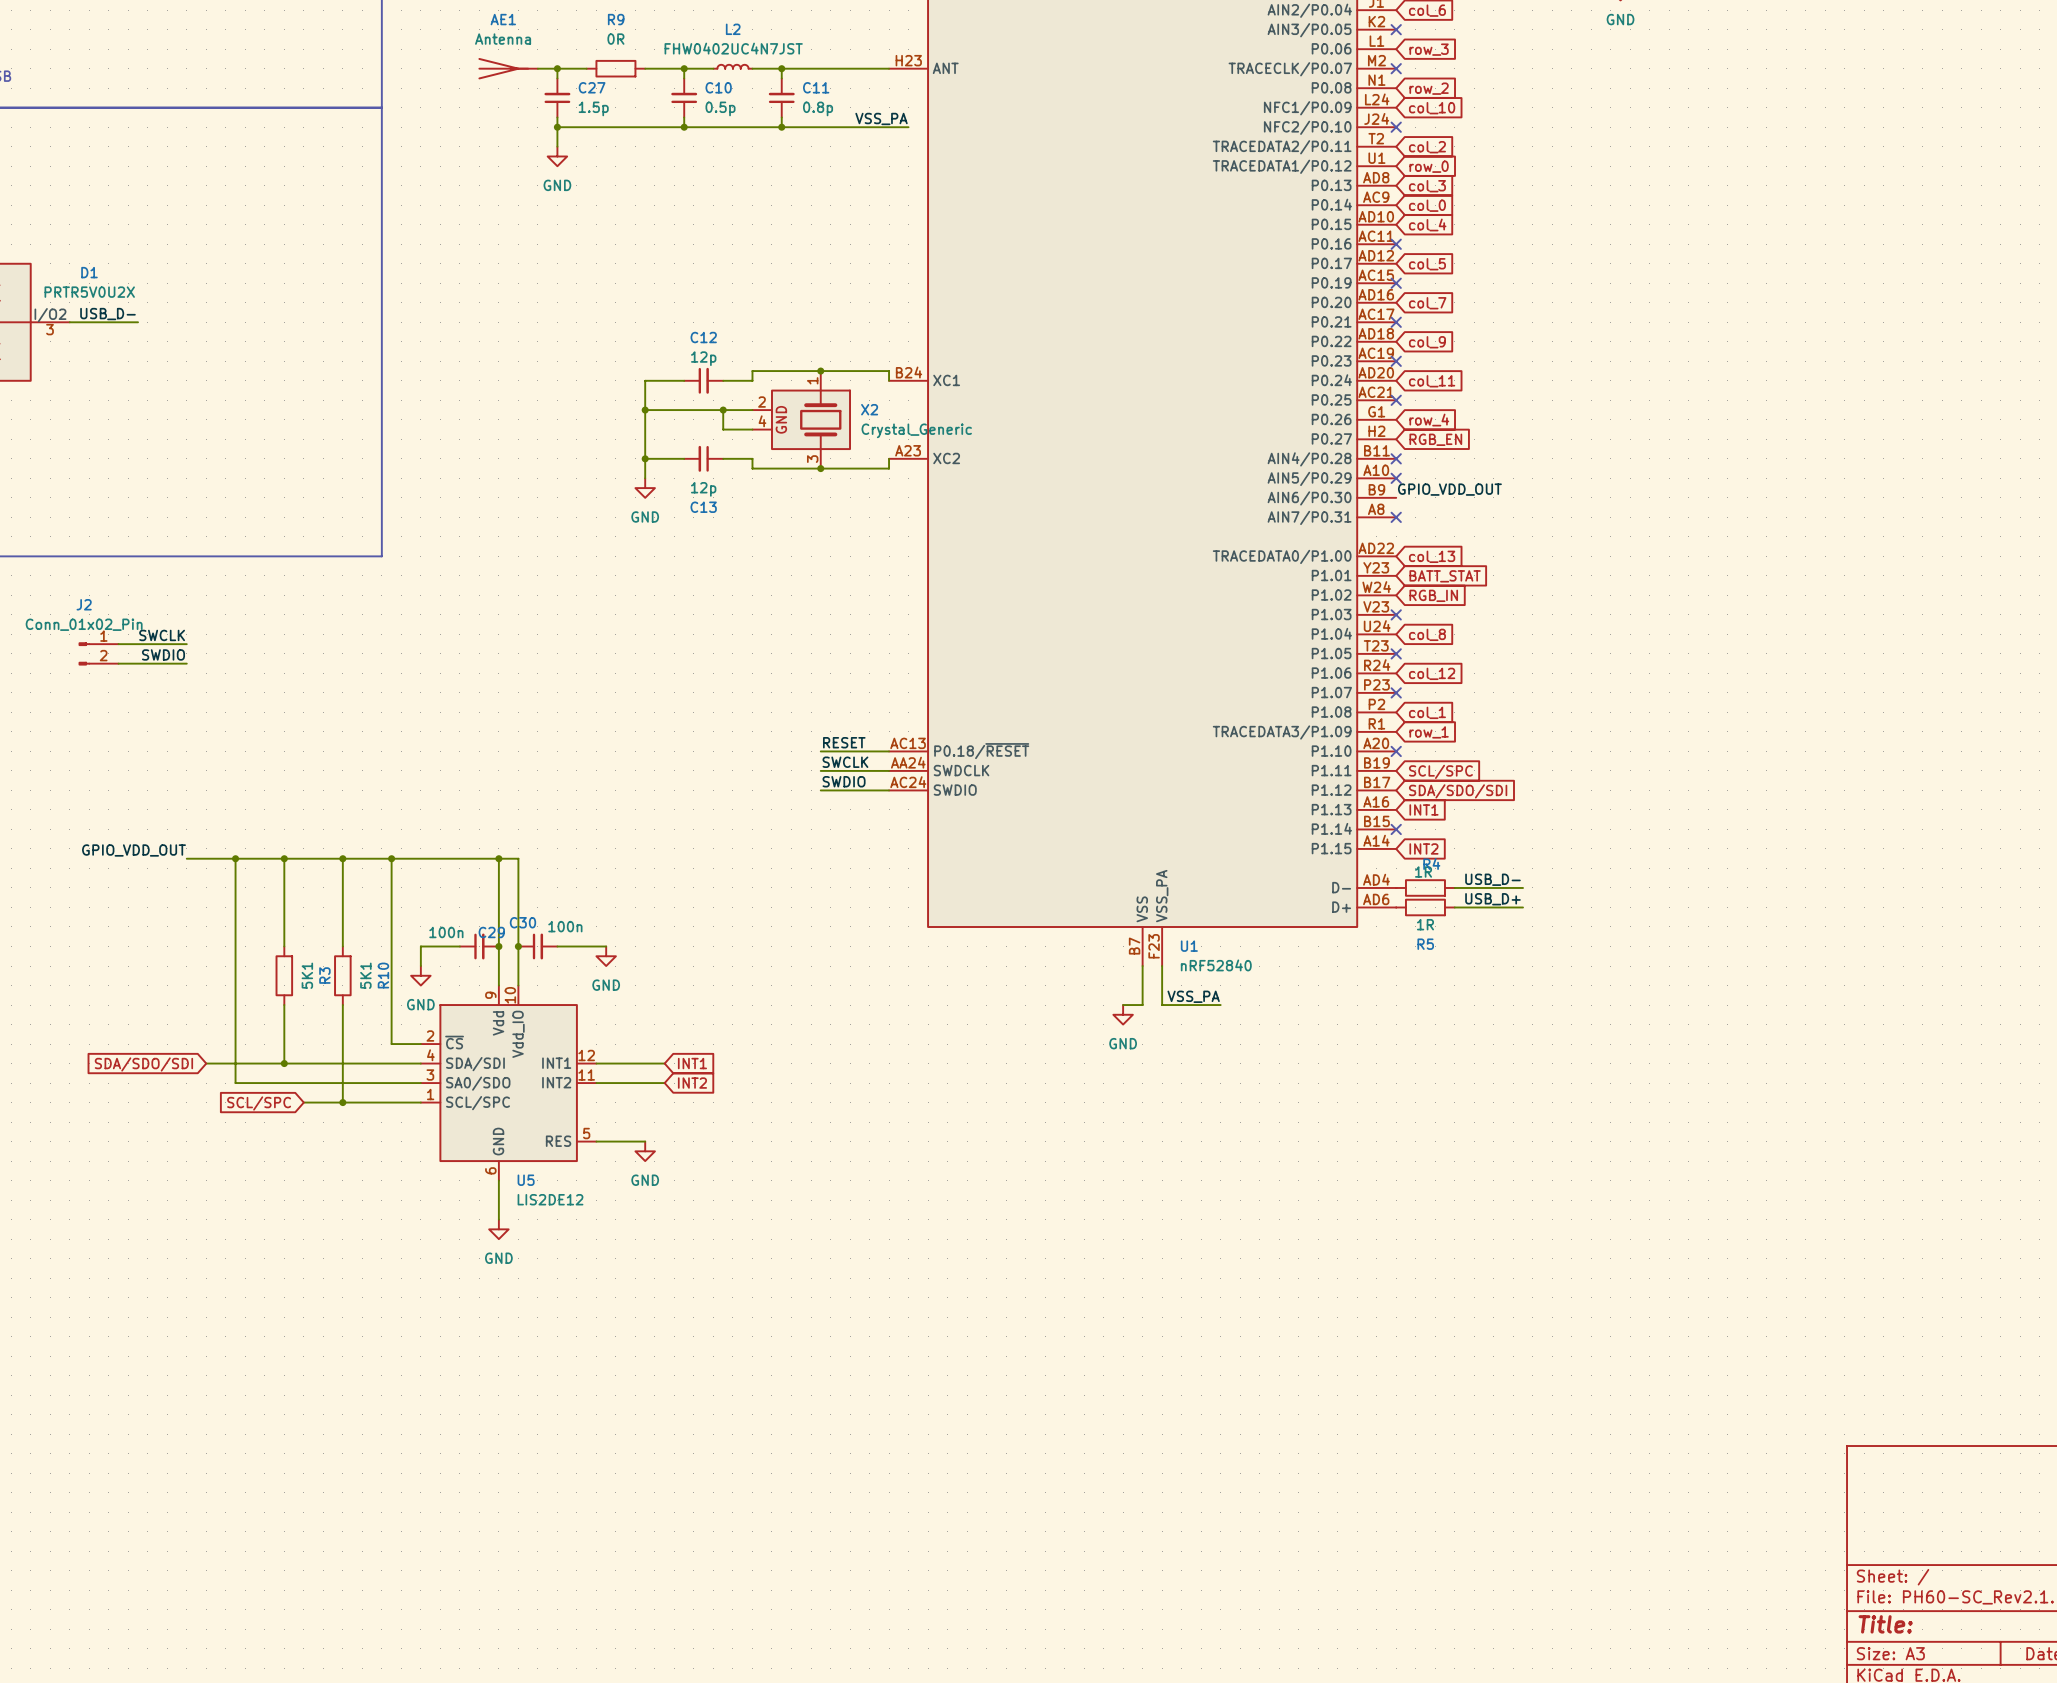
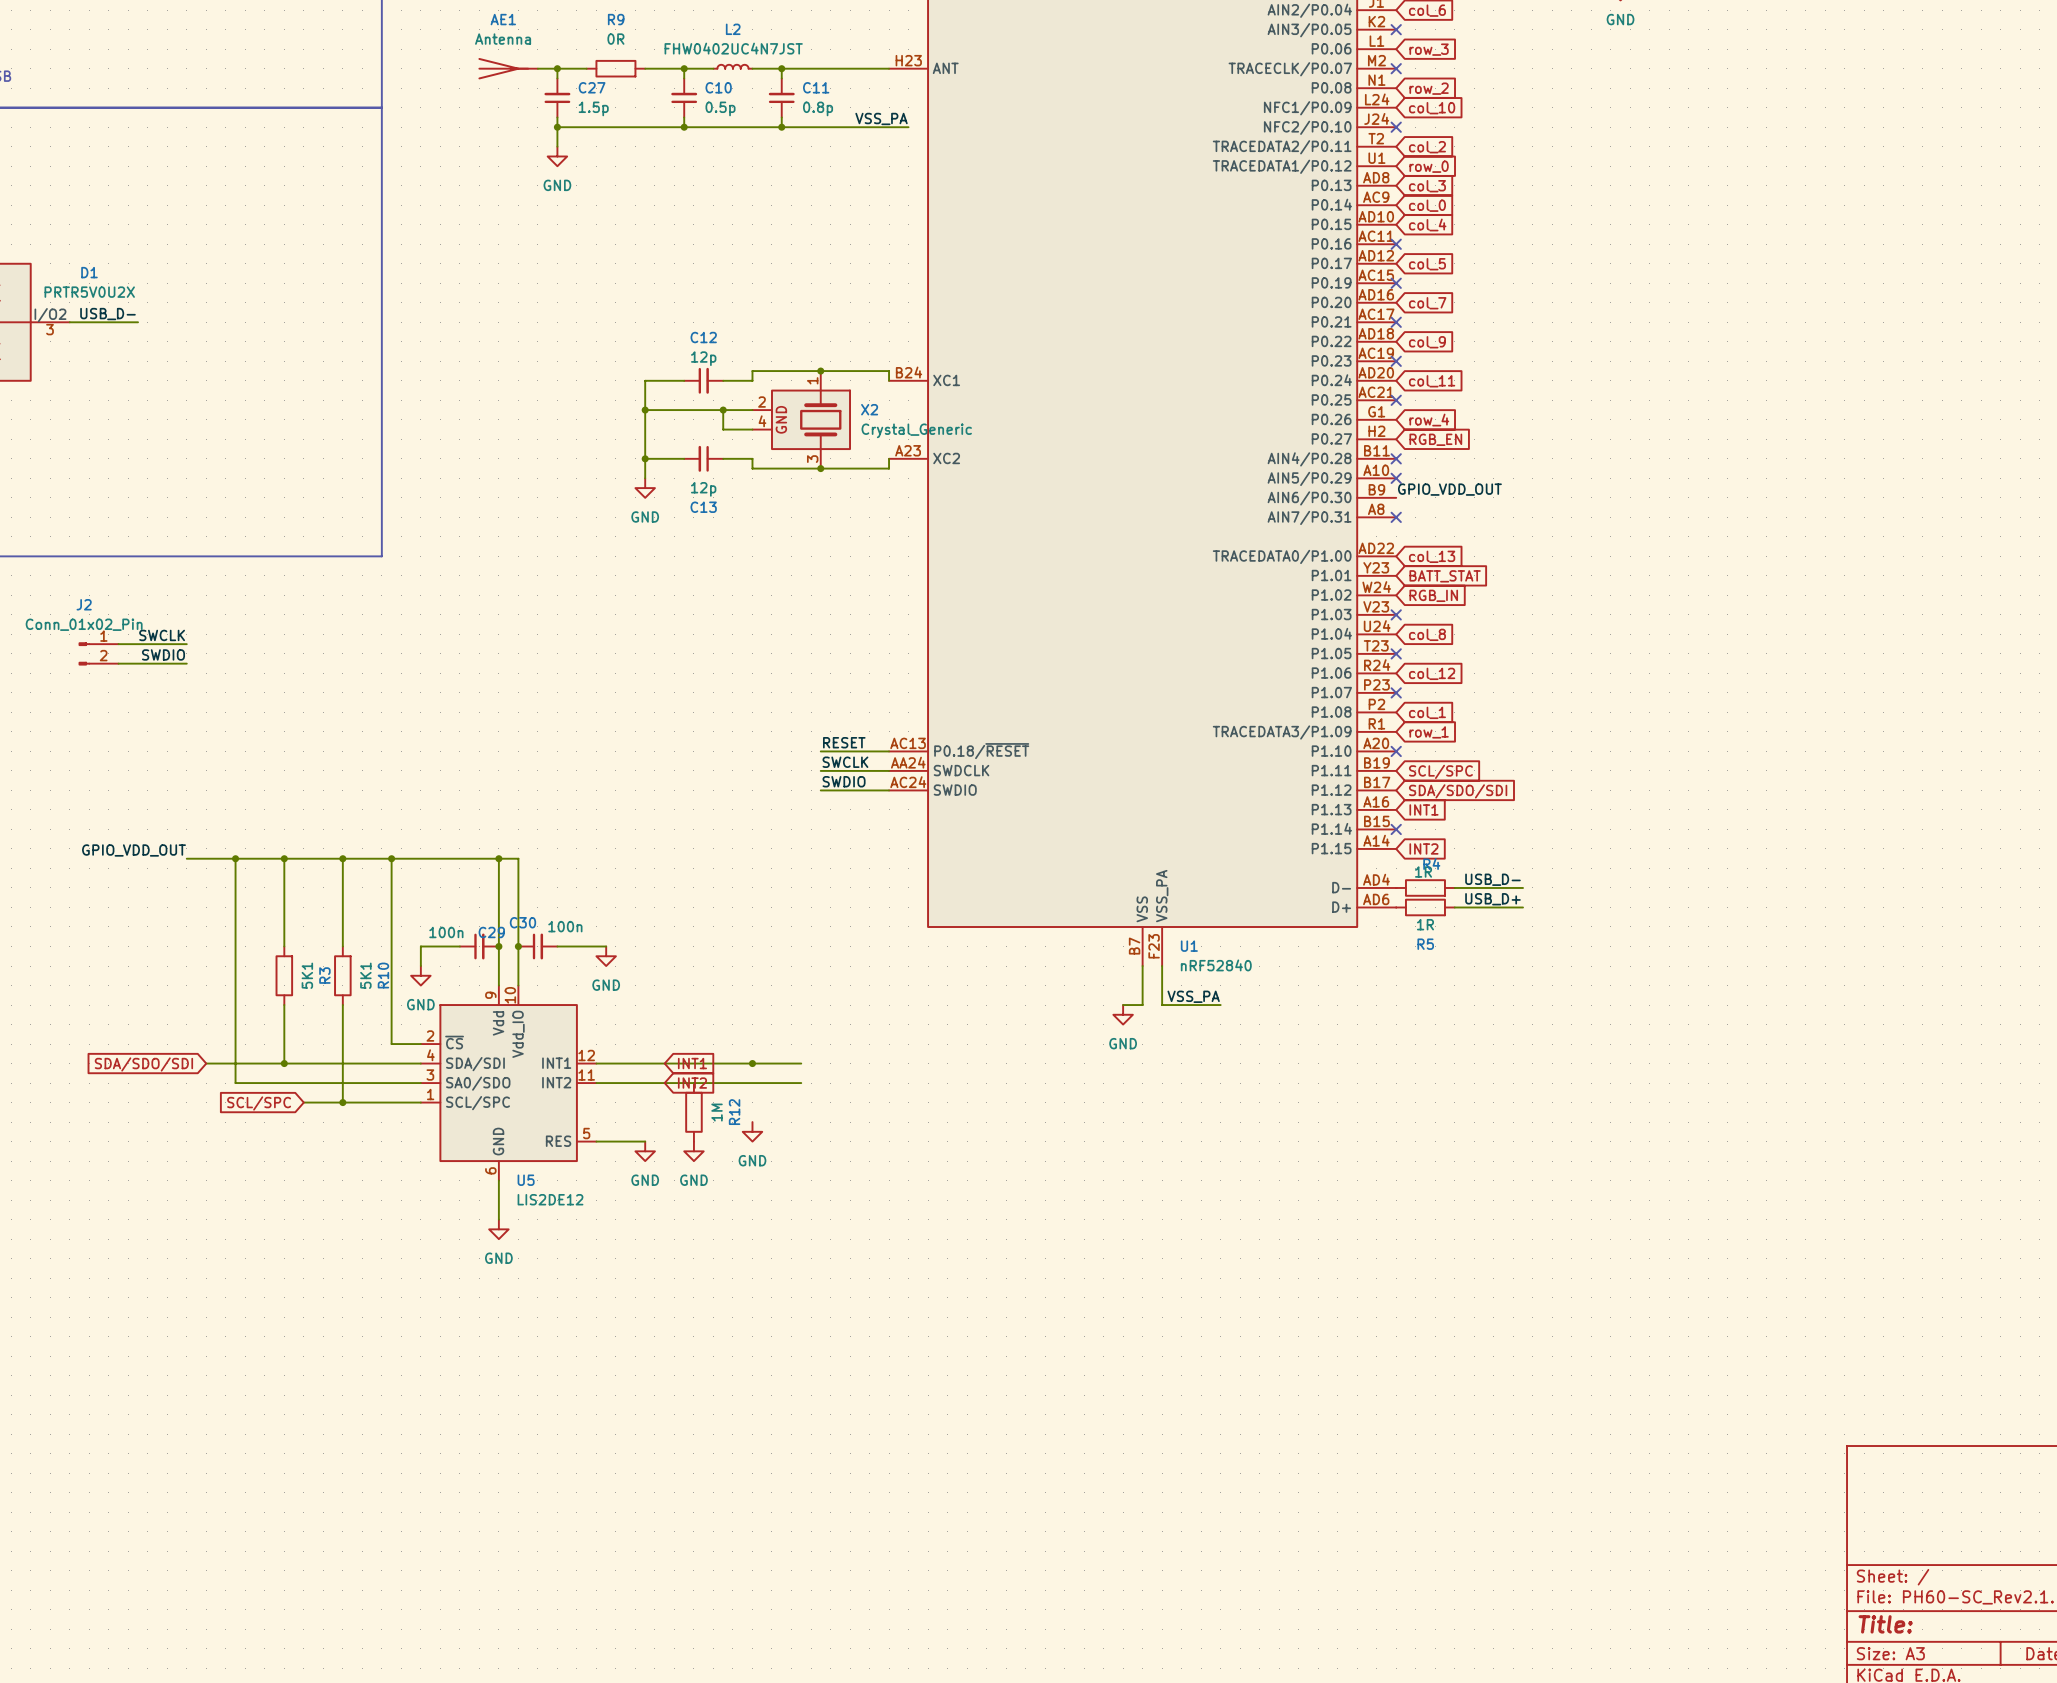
wire: none -> (664, 1063) (801, 1063)
junction: none -> (752, 1063)
wire: none -> (664, 1083) (801, 1083)
R12: none -> 1M (693, 1112)
power symbol: none -> GND (752, 1131)
power symbol: none -> GND (693, 1151)

